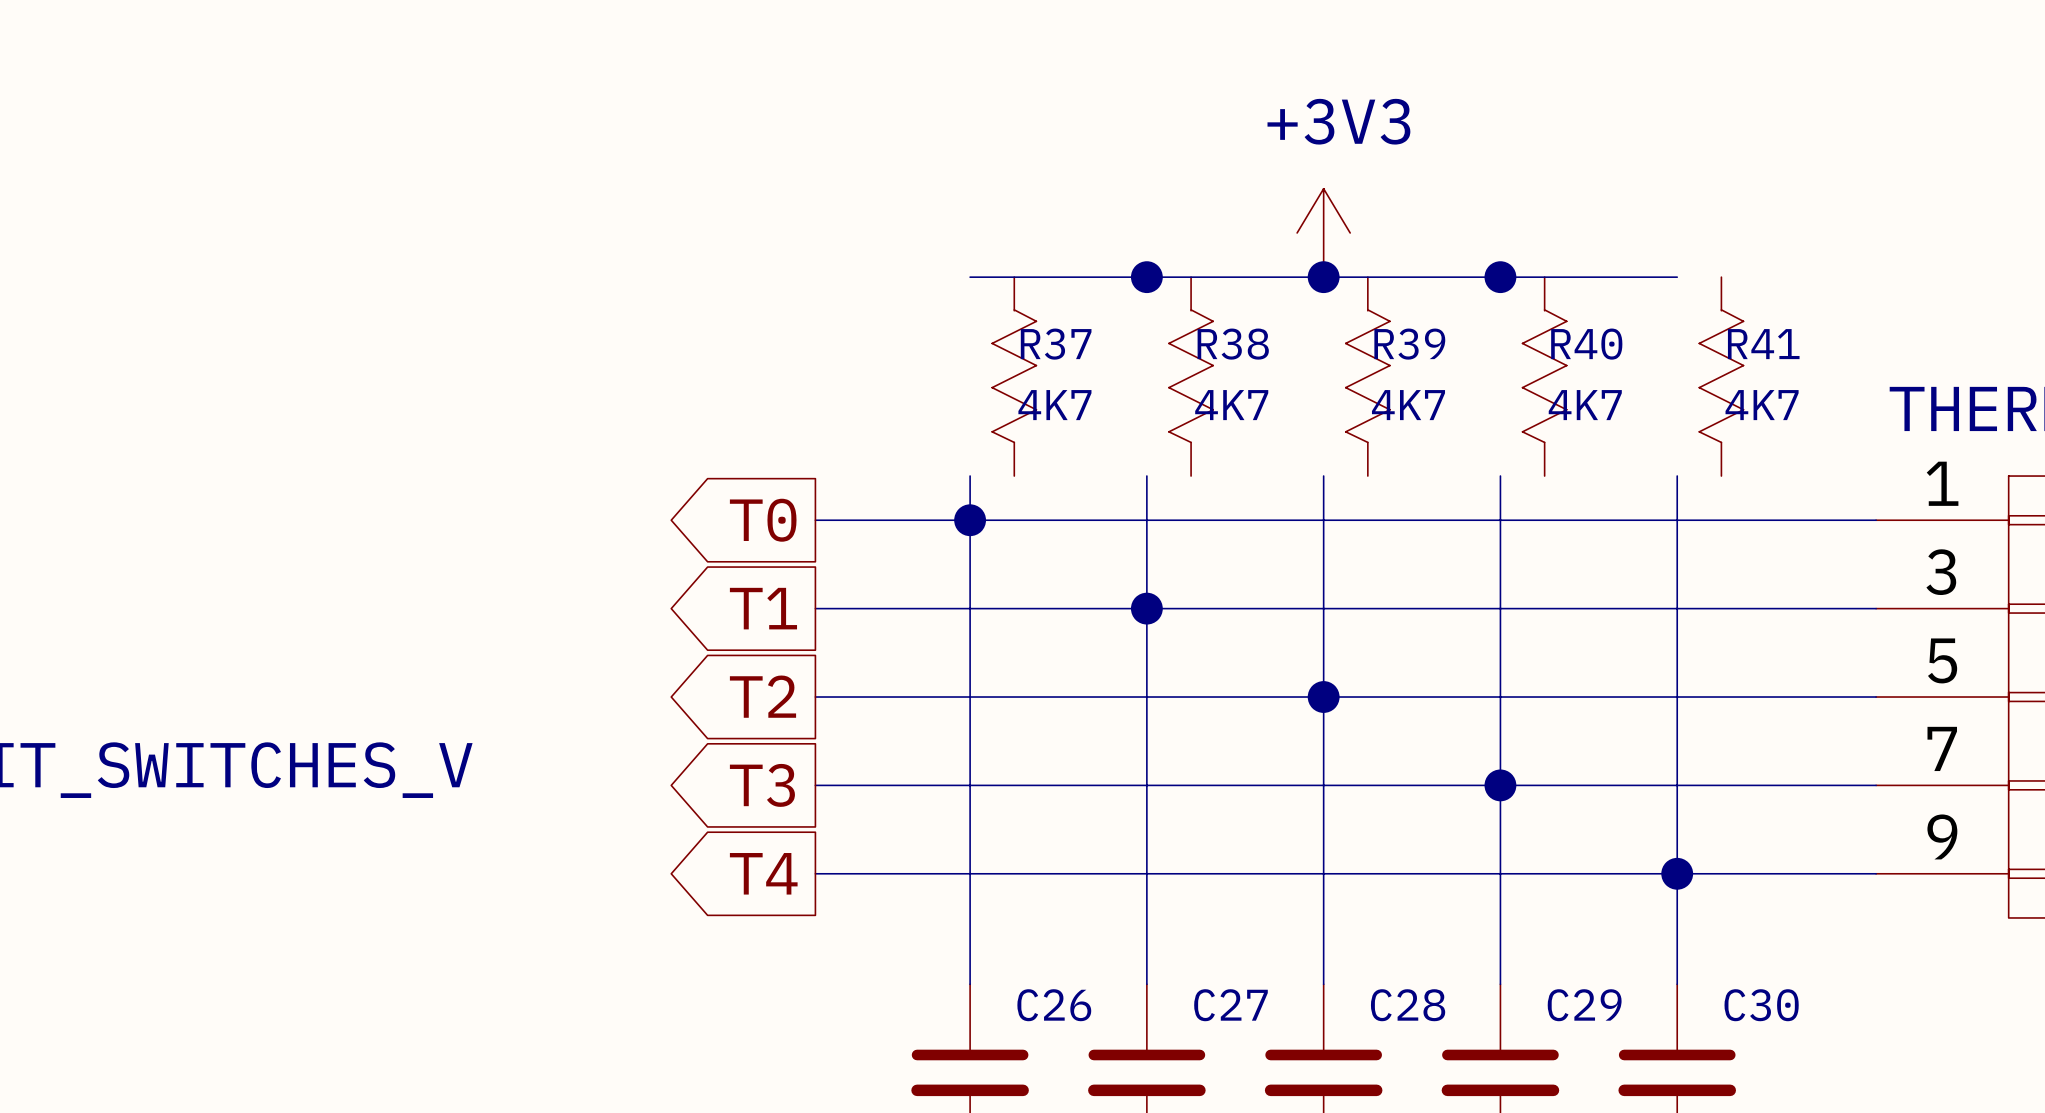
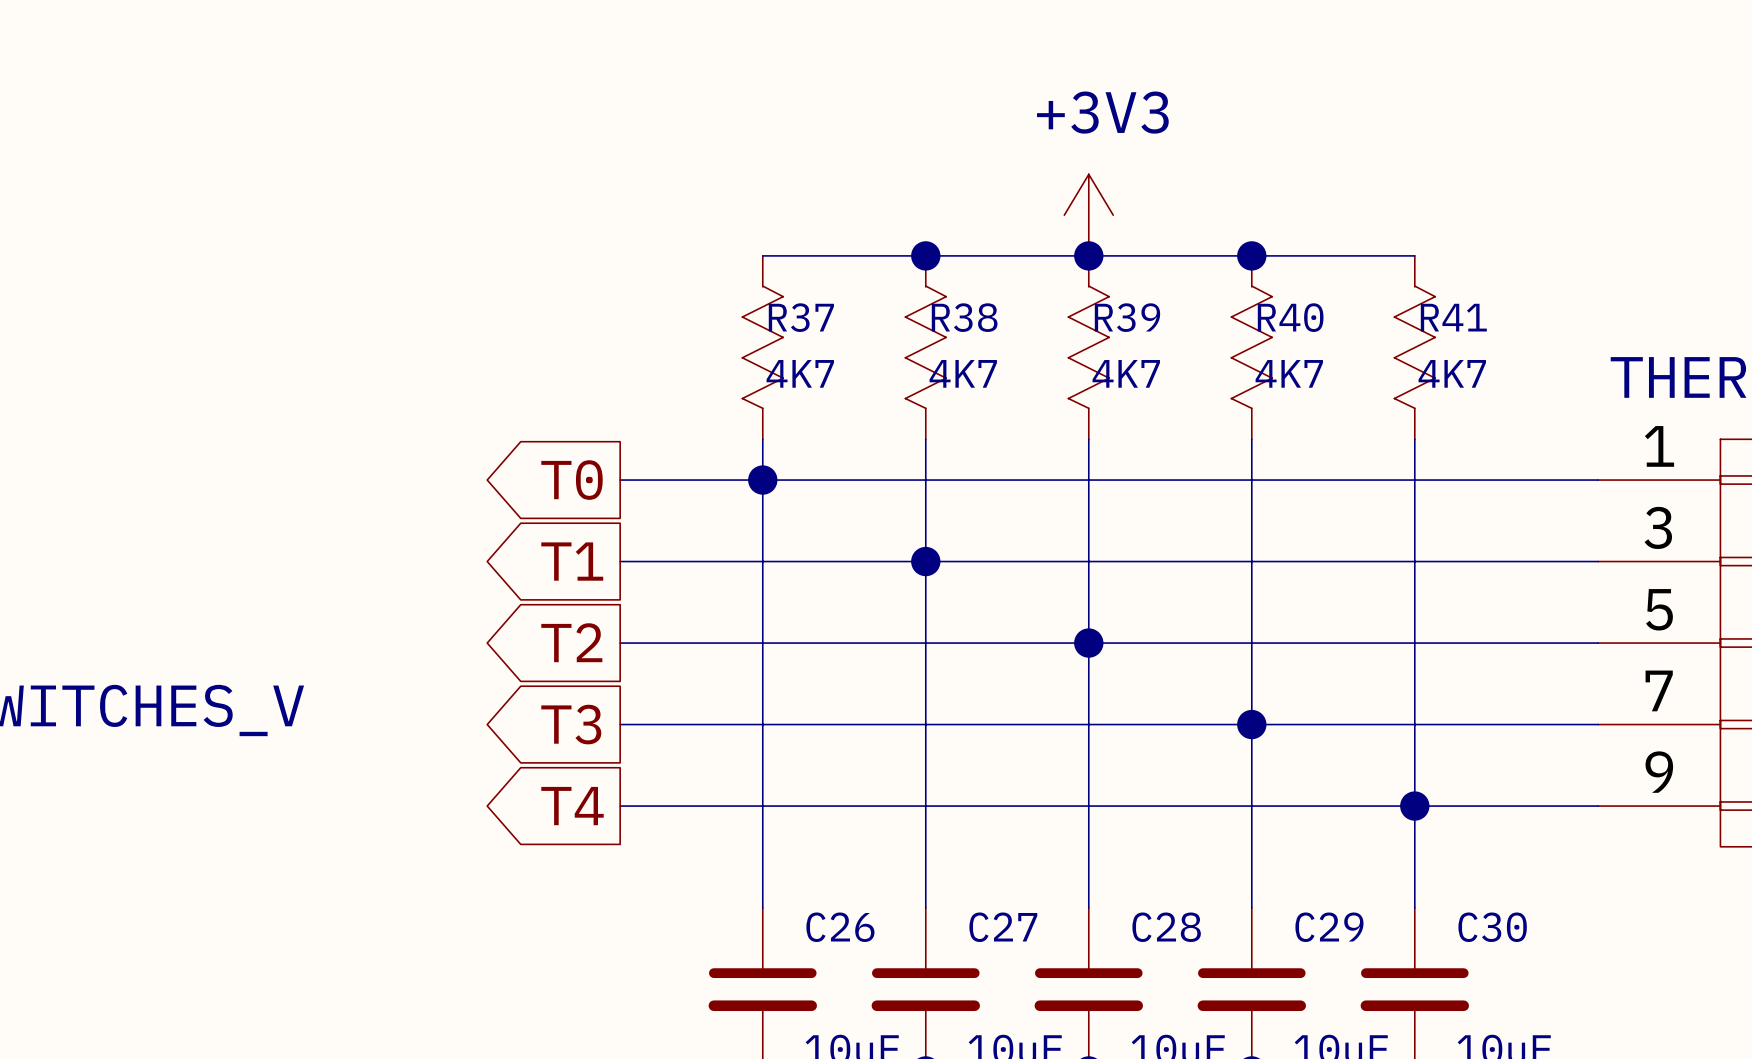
R37 position: (1014, 376) -> (762, 347)
R38 position: (1191, 376) -> (925, 347)
R39 position: (1367, 376) -> (1088, 347)
R40 position: (1544, 376) -> (1251, 347)
R41 position: (1721, 376) -> (1414, 347)

